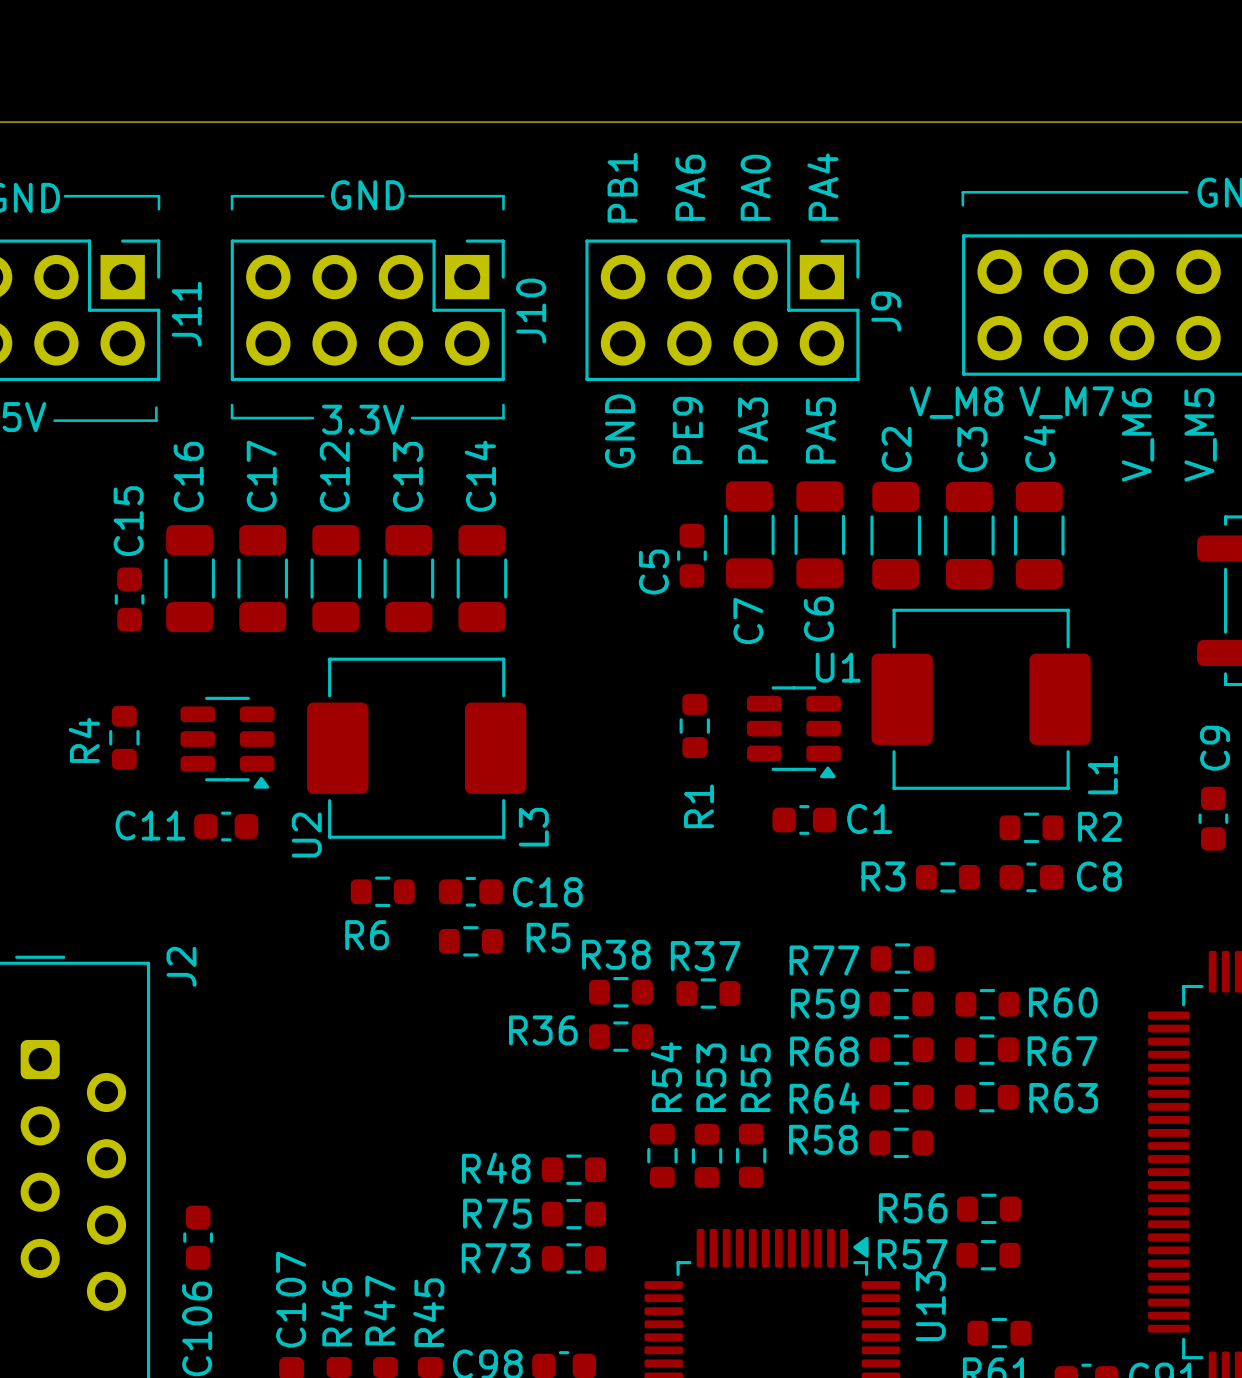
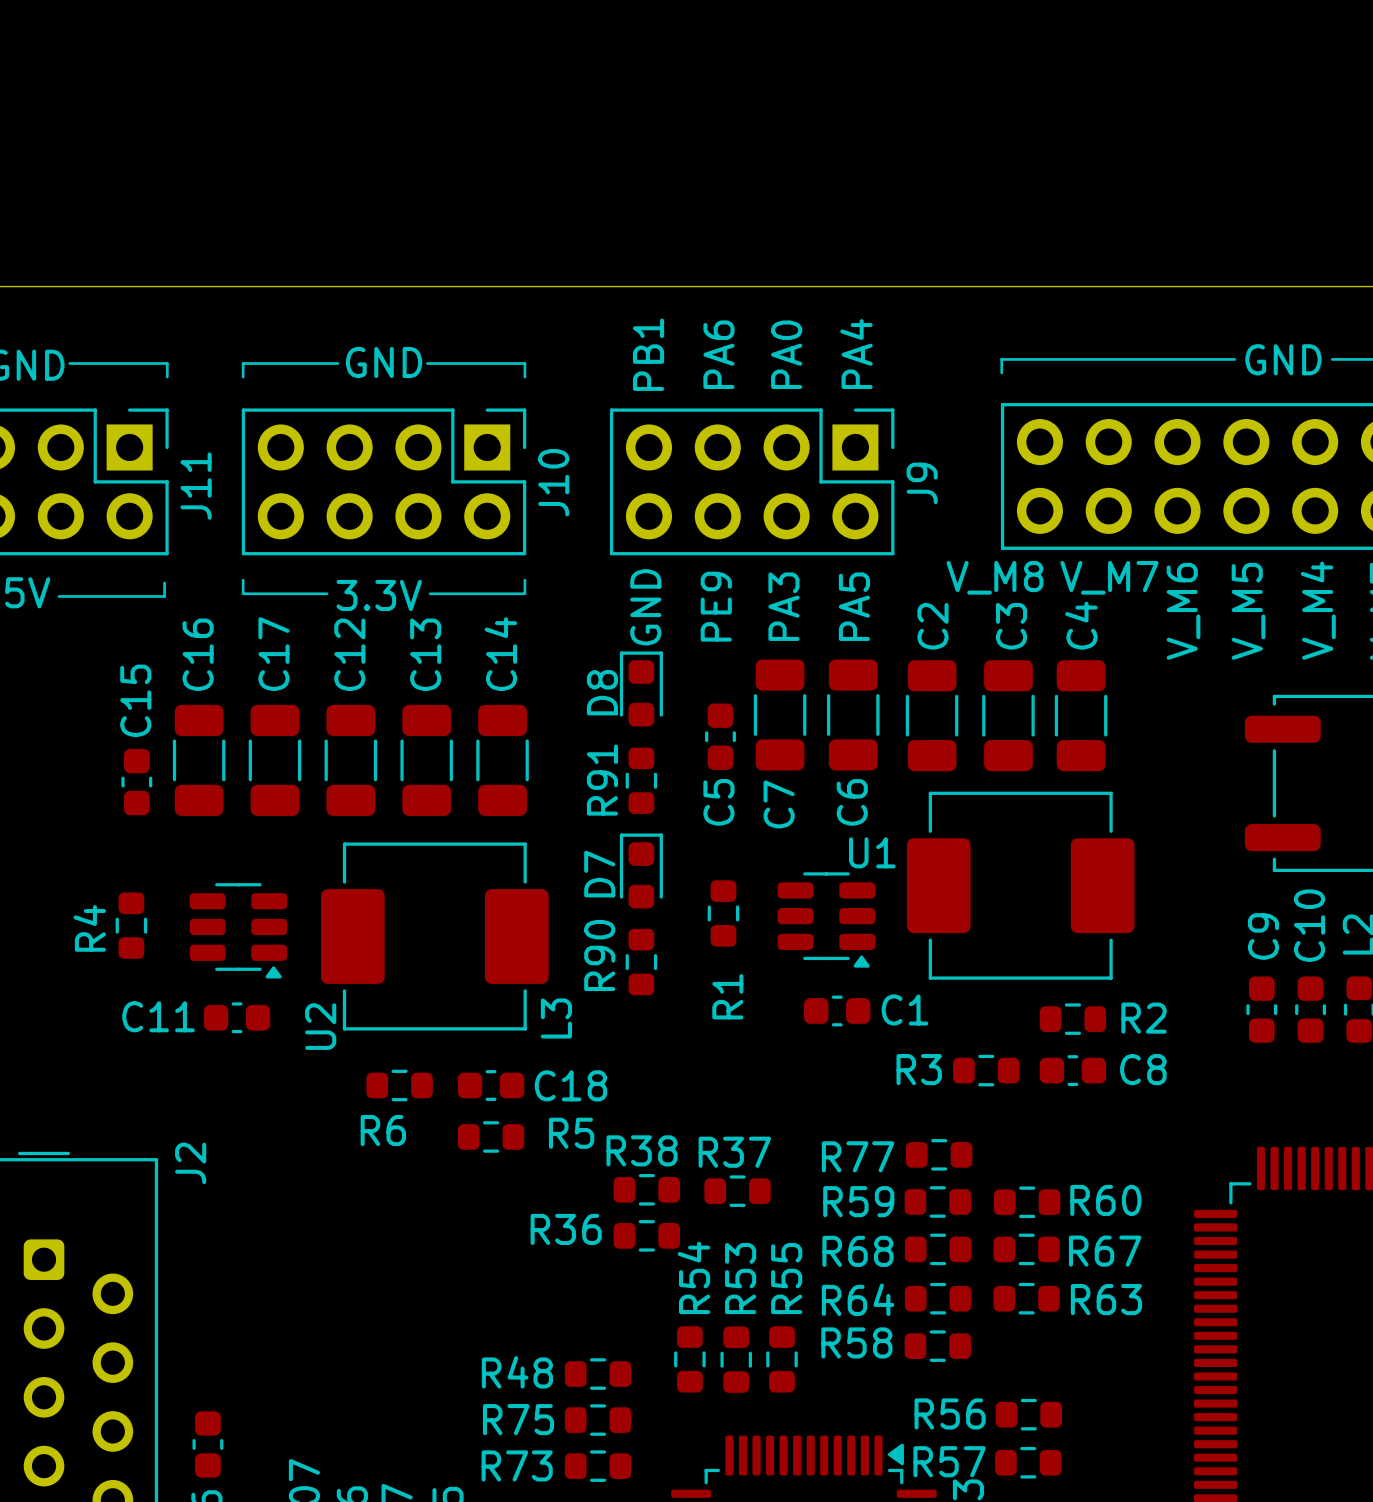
D8: none -> (641, 689)
C5 name position: C5 (653, 572) -> C5 (718, 802)
R91: none -> (641, 780)
D7: none -> (641, 871)
R90: none -> (641, 962)
L1 name: L1 (1102, 774) -> none

